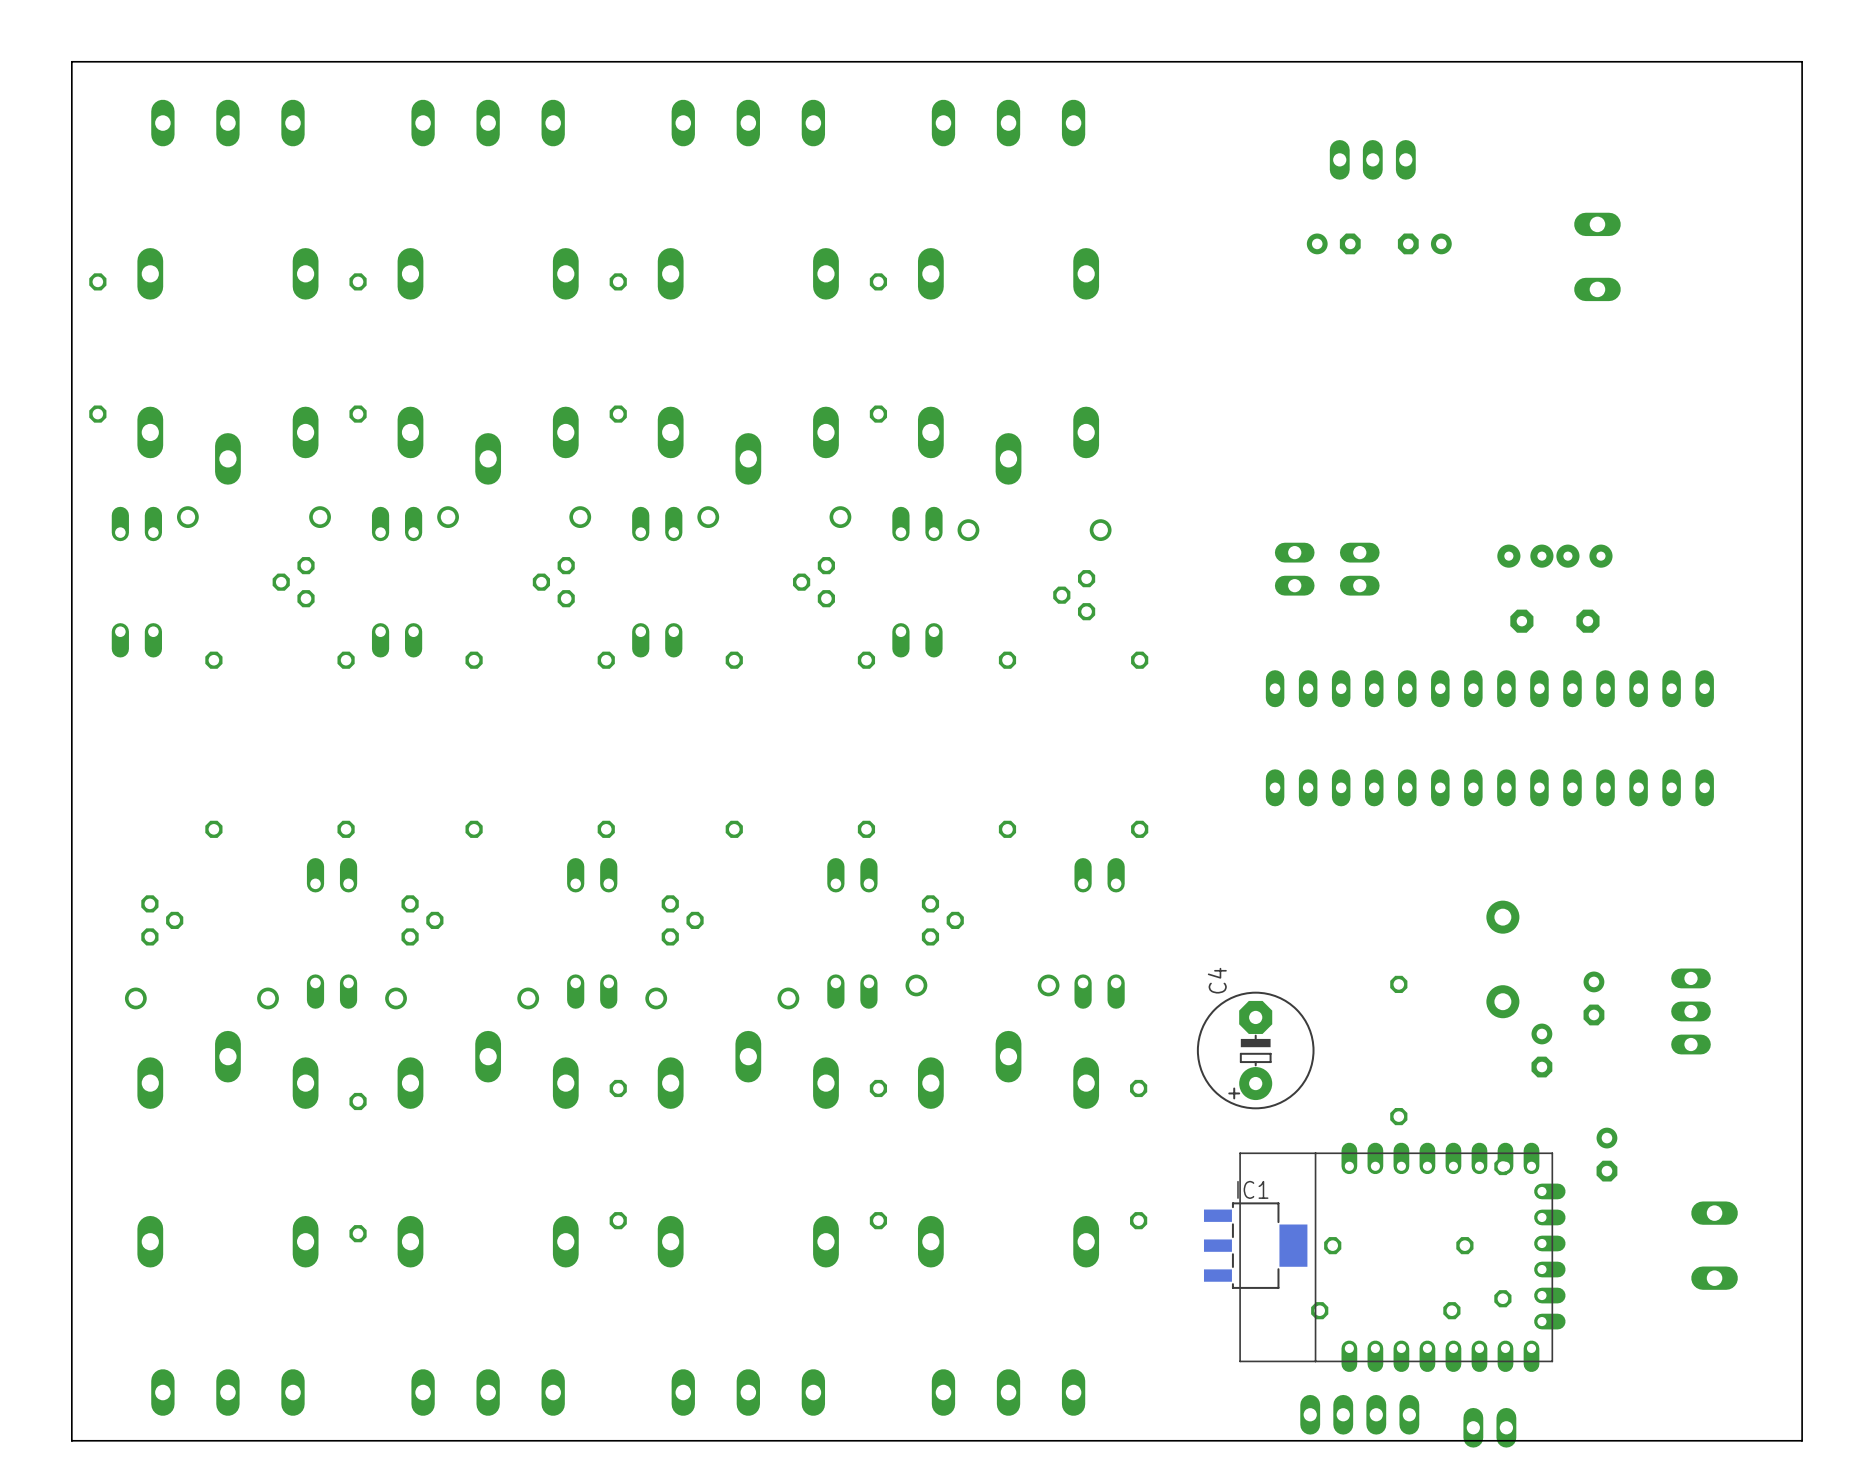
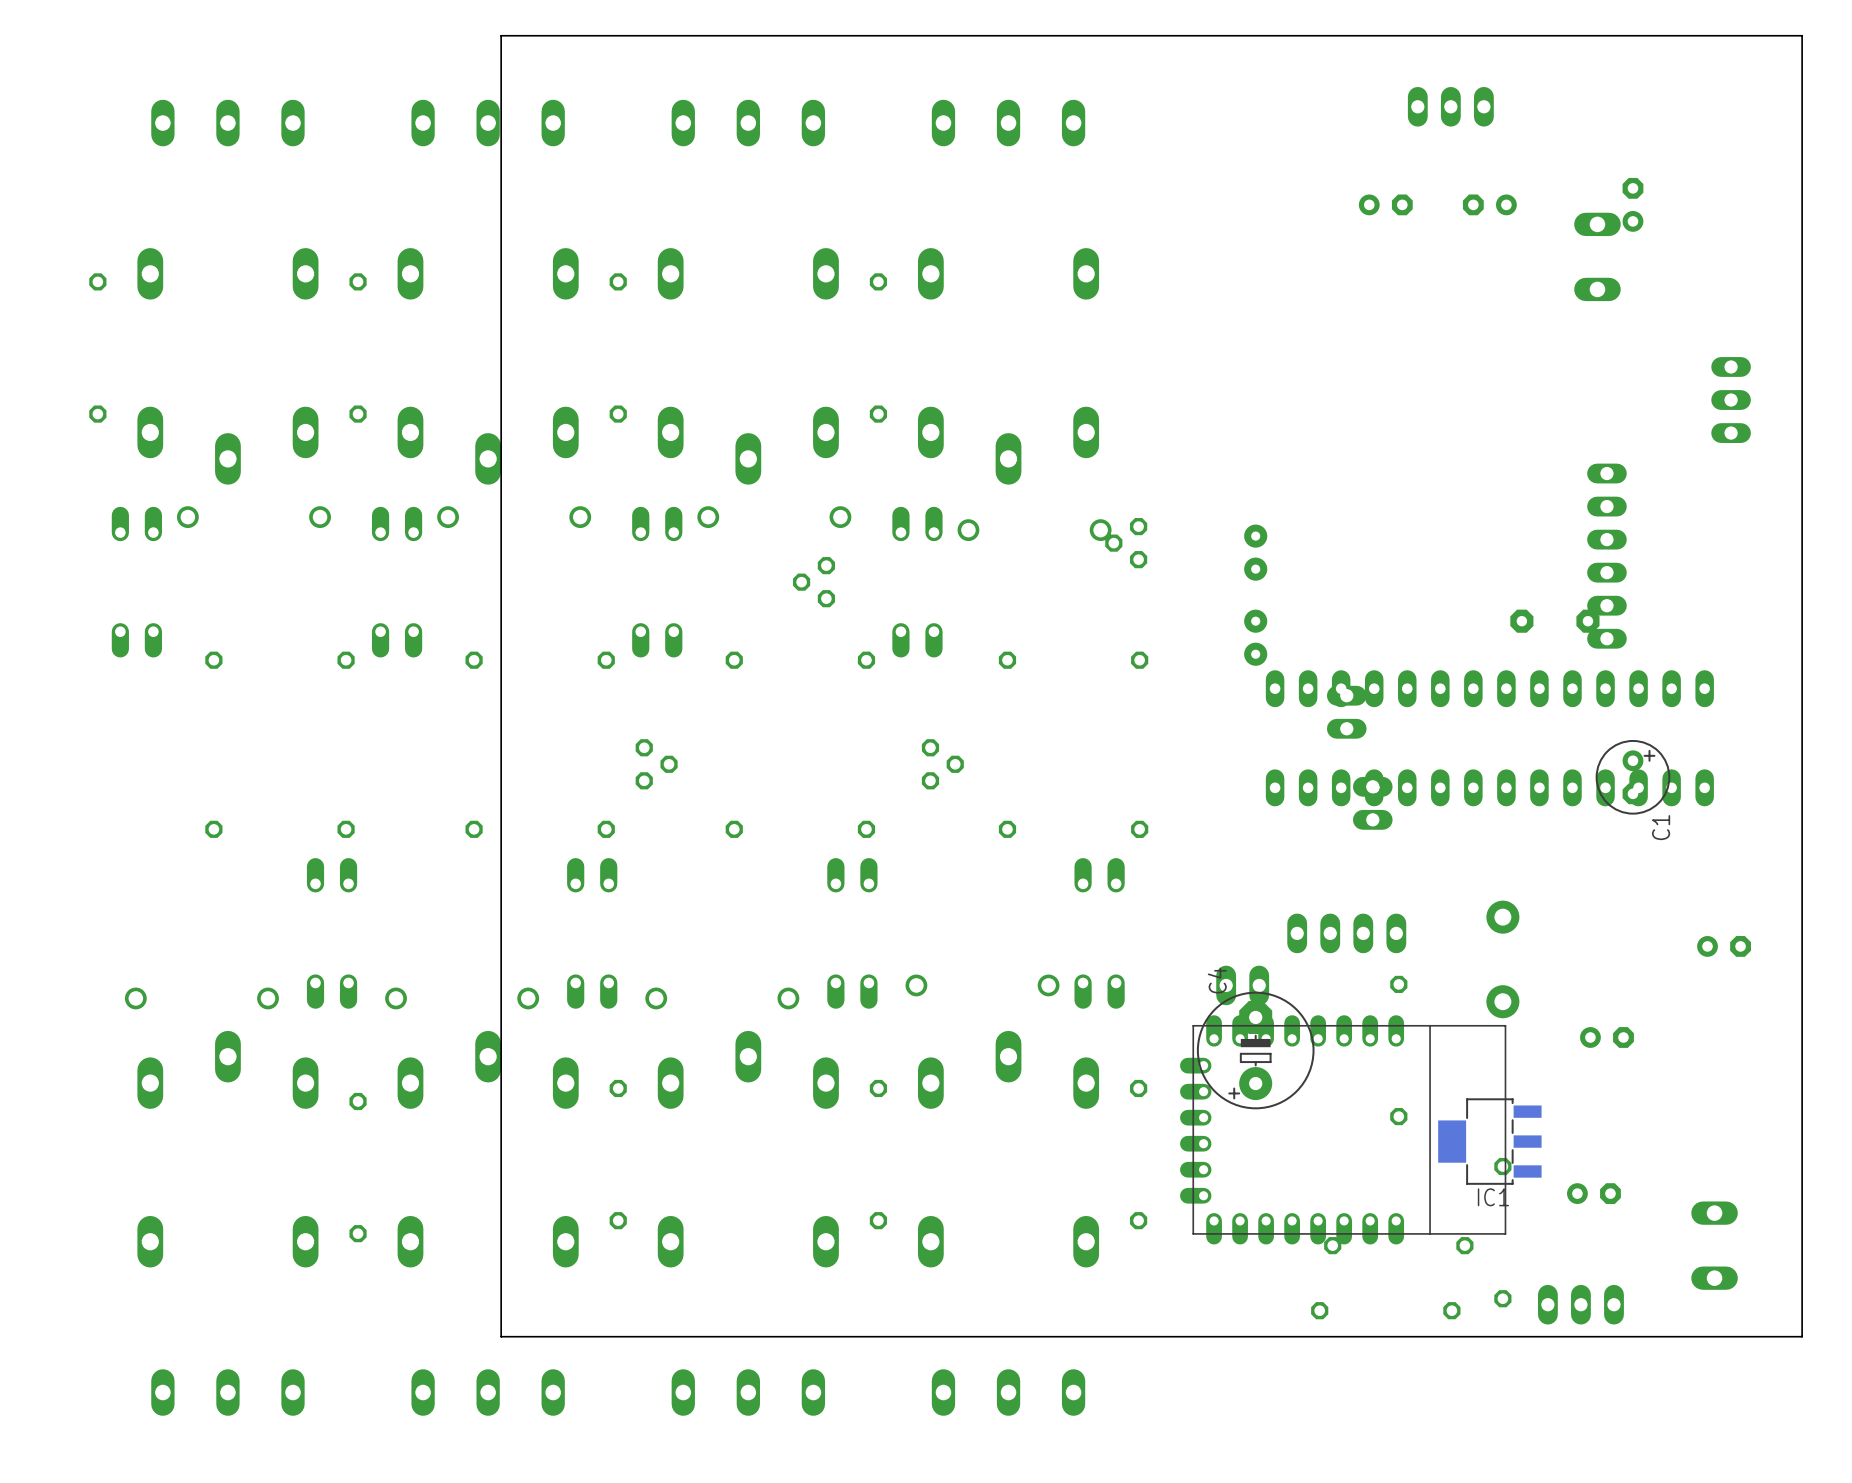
board edge: (1802, 61) (71, 61) (71, 1440) (1802, 1440) (1802, 1336) -> (1802, 61) (1802, 35) (501, 35) (501, 1336) (1802, 1336)
part position: (1372, 159) -> (1450, 106)
part: none -> (1385, 204)
part: none -> (1489, 204)
part: none -> (1632, 204)
part: (1333, 243) -> none
part: (1424, 243) -> none
part: none -> (1731, 400)
part: none -> (1255, 552)
part: (1525, 556) -> none
part: (1584, 556) -> none
part: none -> (1606, 556)
part: (1294, 569) -> none
part: (1359, 569) -> none
part: (293, 582) -> none
part: (553, 582) -> none
part position: (1074, 595) -> (1126, 543)
part: none -> (1255, 637)
part: none -> (1346, 712)
part: none -> (656, 764)
part: none -> (942, 764)
part: none -> (1372, 803)
part: (162, 920) -> none
part: (422, 920) -> none
part: (682, 920) -> none
part: (942, 920) -> none
part: none -> (1346, 933)
part: none -> (1724, 946)
part: none -> (1242, 985)
C1 side: top (1593, 998) -> bottom (1632, 777)
part: (1691, 1011) -> none
part: none -> (1606, 1037)
part: (1541, 1050) -> none
part rotation: 0° (1606, 1154) -> 90° counterclockwise (1593, 1193)
part position: (1606, 1154) -> (1593, 1193)
IC1 rotation: 0° (1255, 1245) -> 180° (1489, 1141)
IC1 position: (1255, 1245) -> (1489, 1141)
part rotation: 0° (1402, 1257) -> 180° (1343, 1129)
part: none -> (1580, 1304)
part: (1359, 1414) -> none
part: (1489, 1427) -> none

